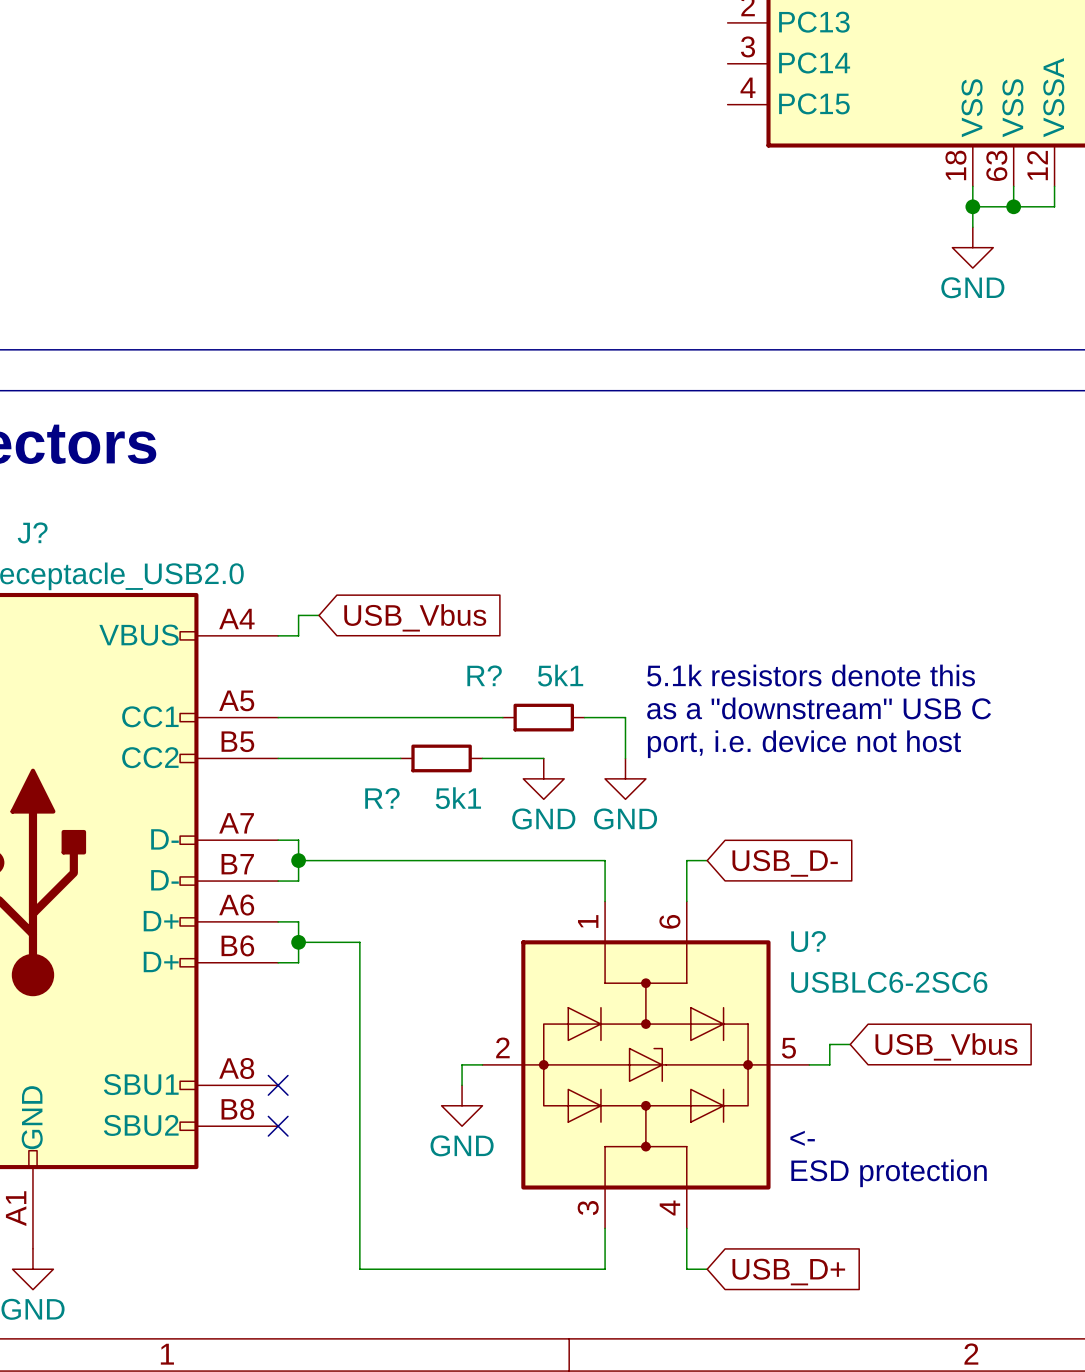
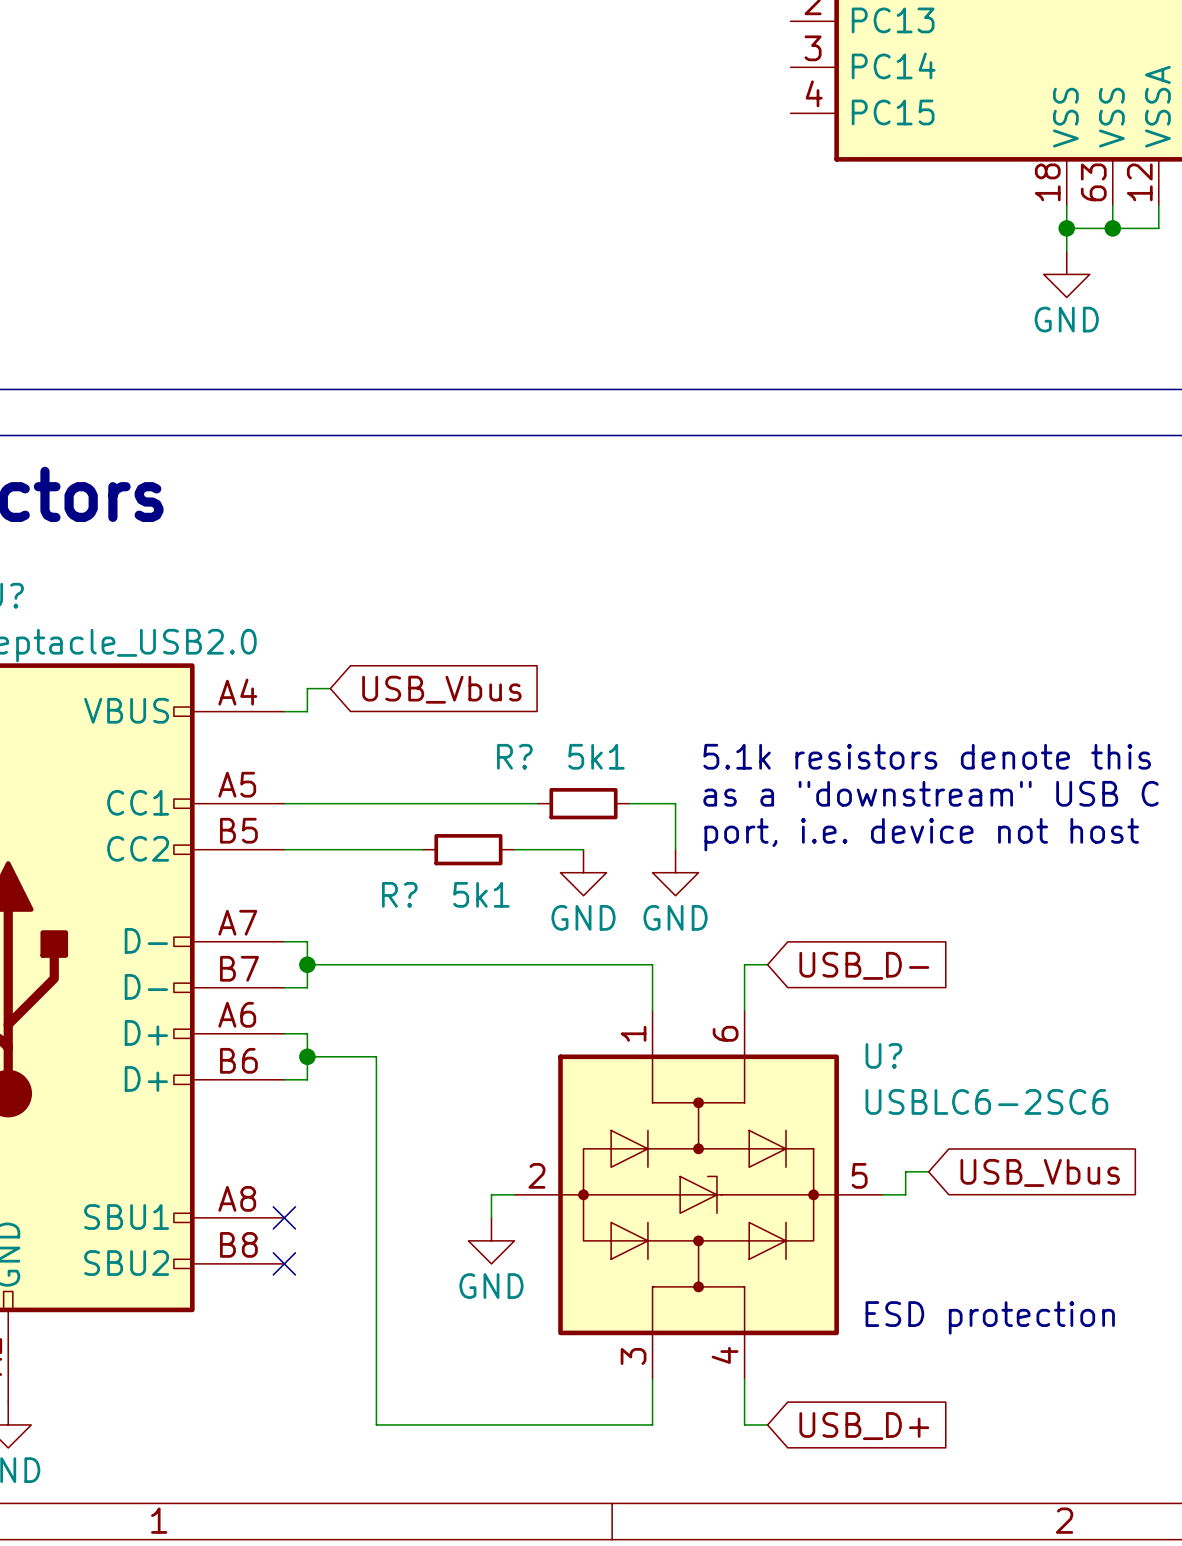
text: <- (802, 1138) -> none

